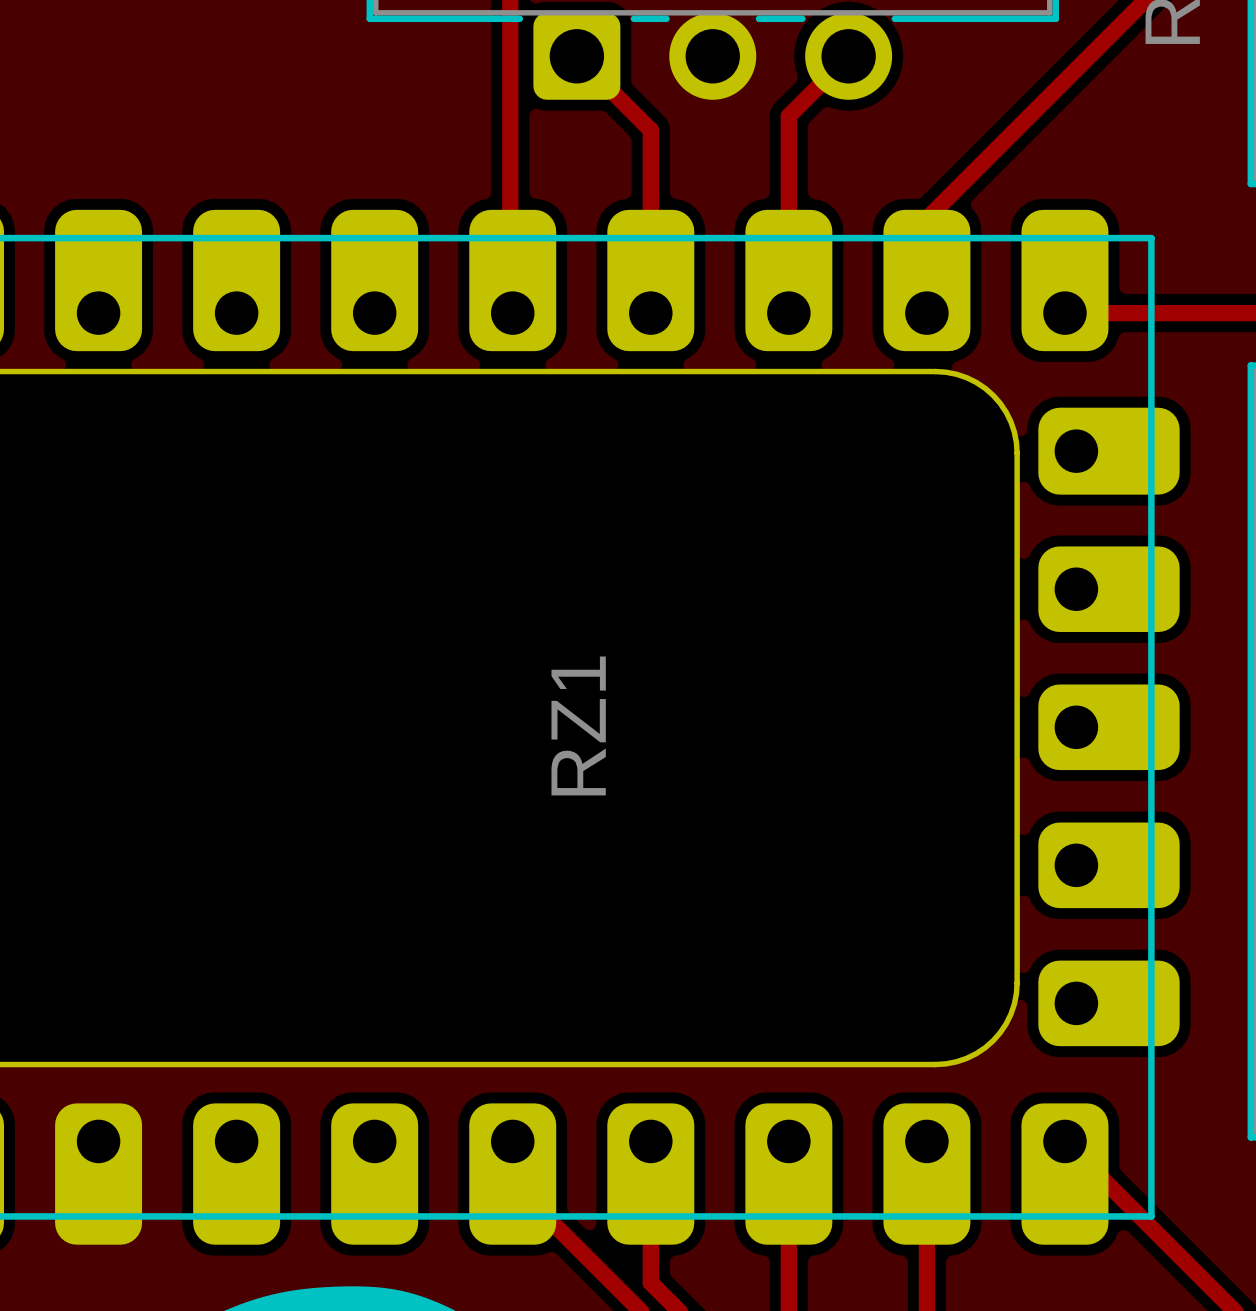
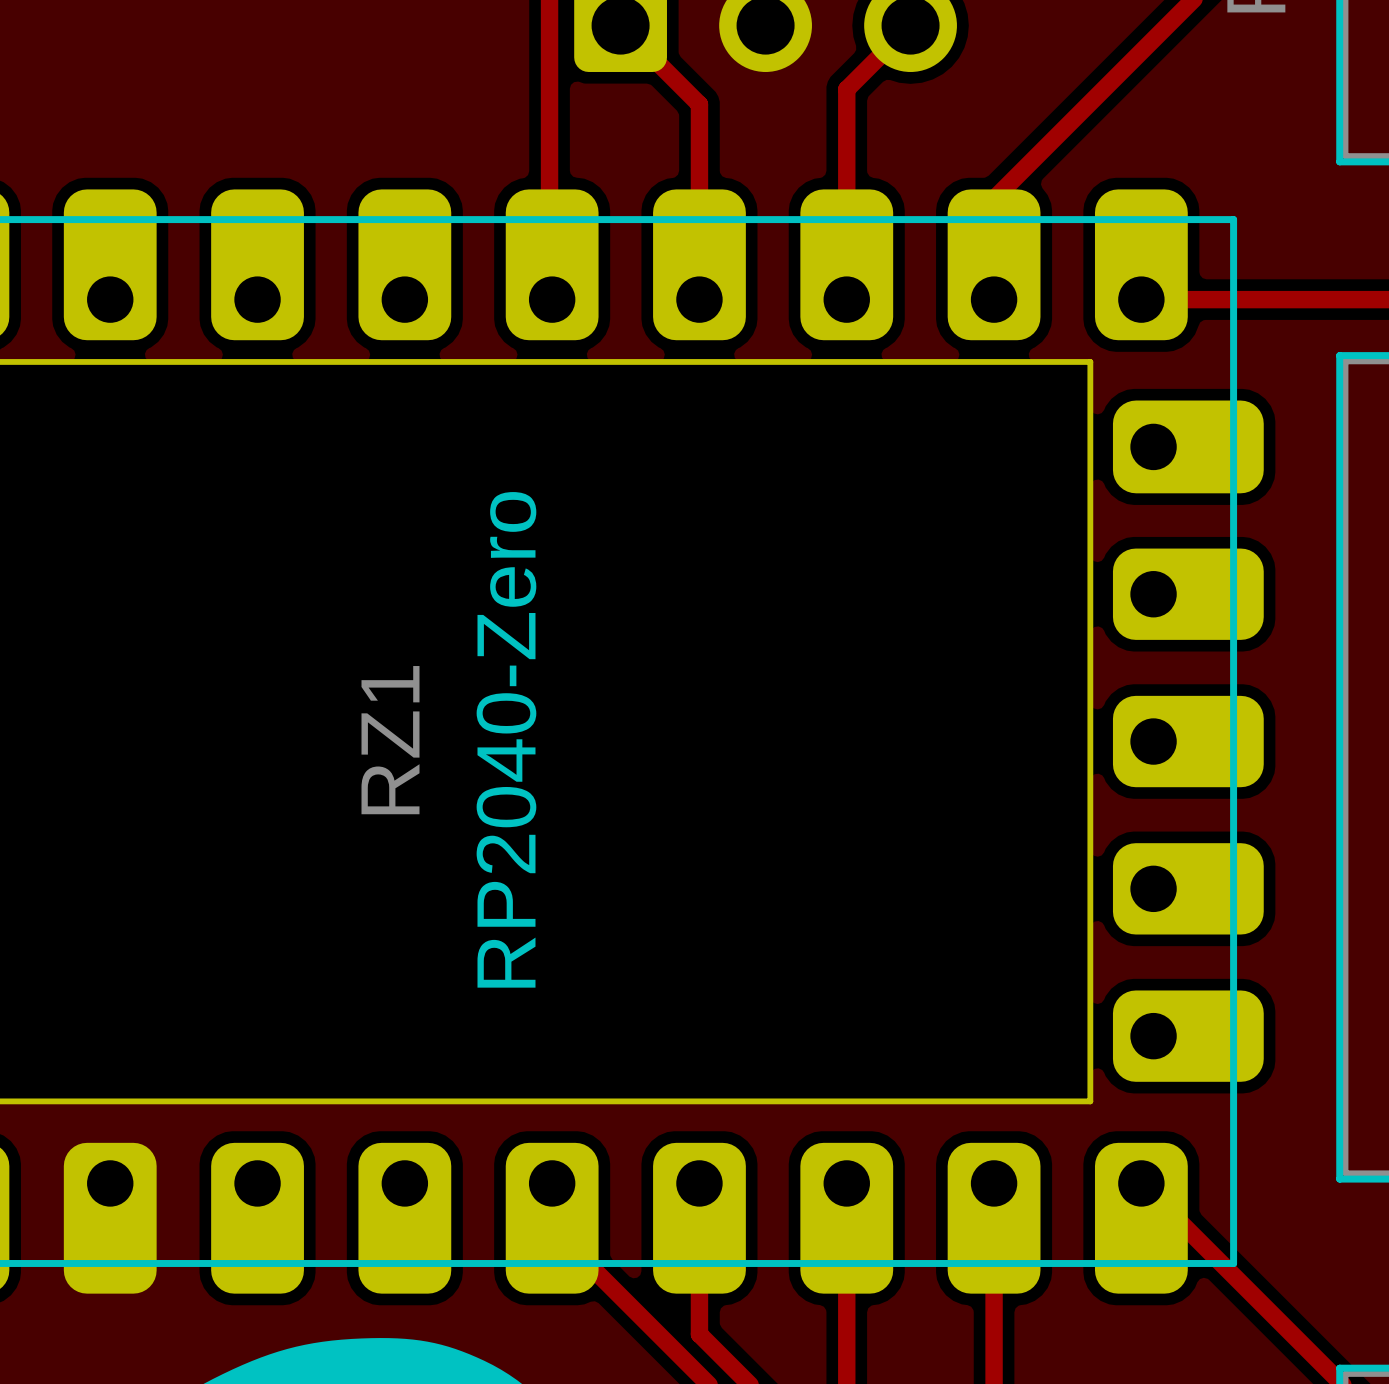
board edge: (935, 371) (966, 377) (993, 395) (1010, 421) (1017, 453) -> (1003, 361) (1090, 361) (1090, 448)
RZ1 value: none -> RP2040-Zero (506, 739)
RZ1 name position: RZ1 (578, 725) -> RZ1 (390, 740)
board edge: (1017, 983) (1010, 1014) (993, 1040) (966, 1058) (935, 1064) -> (1090, 1014) (1090, 1101) (1003, 1101)

